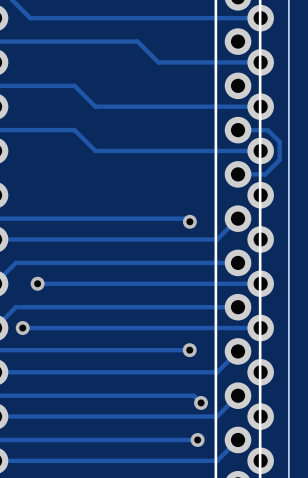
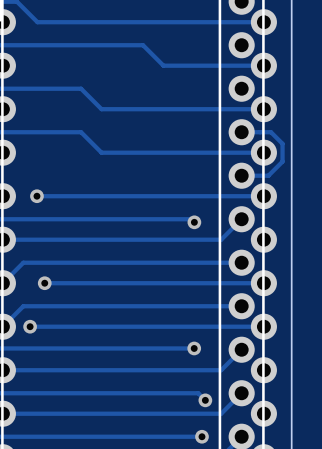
track: none -> (36, 196) (263, 196)
via: none -> (36, 196)

